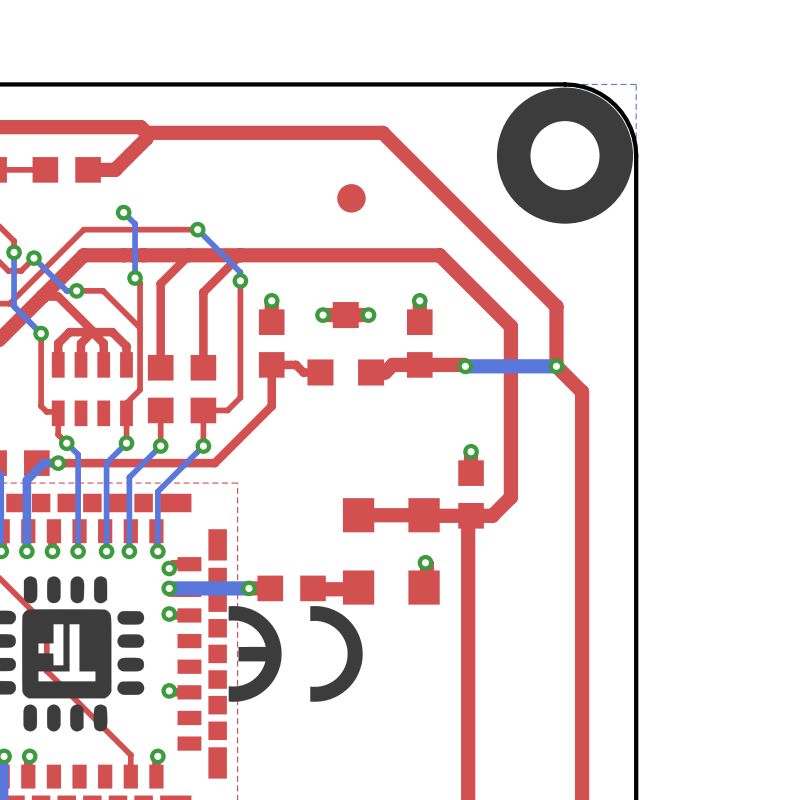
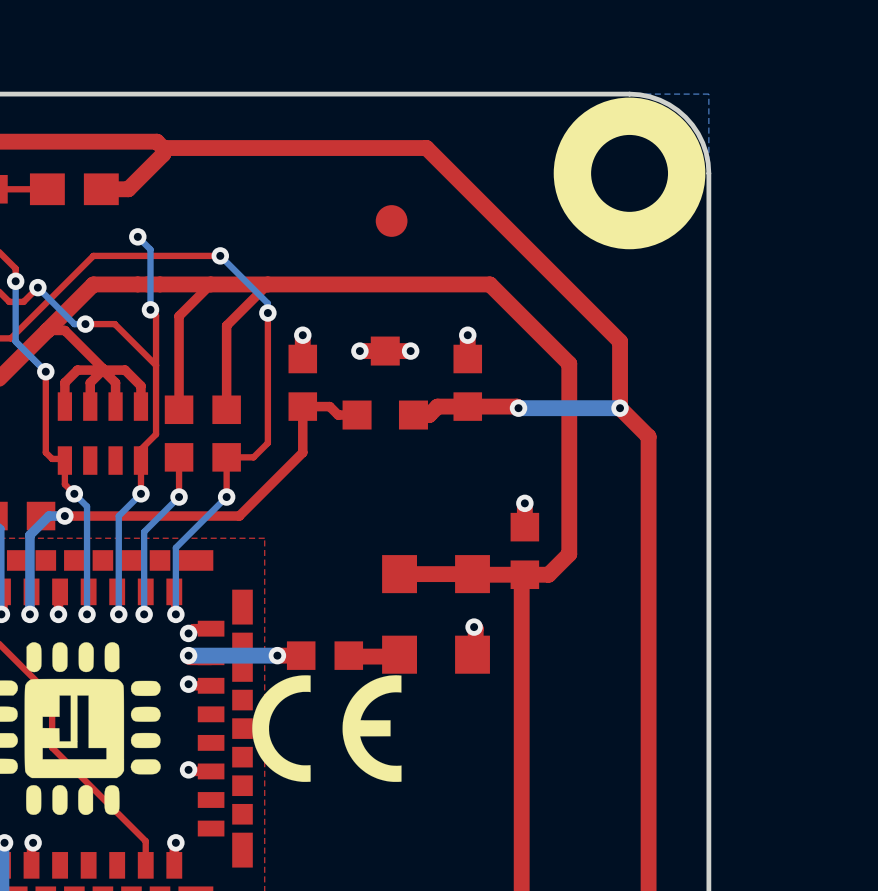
part footprint: [32, 157, 101, 183] -> [29, 173, 119, 206]
drawing shape: [228, 606, 363, 702] -> [252, 675, 402, 782]

